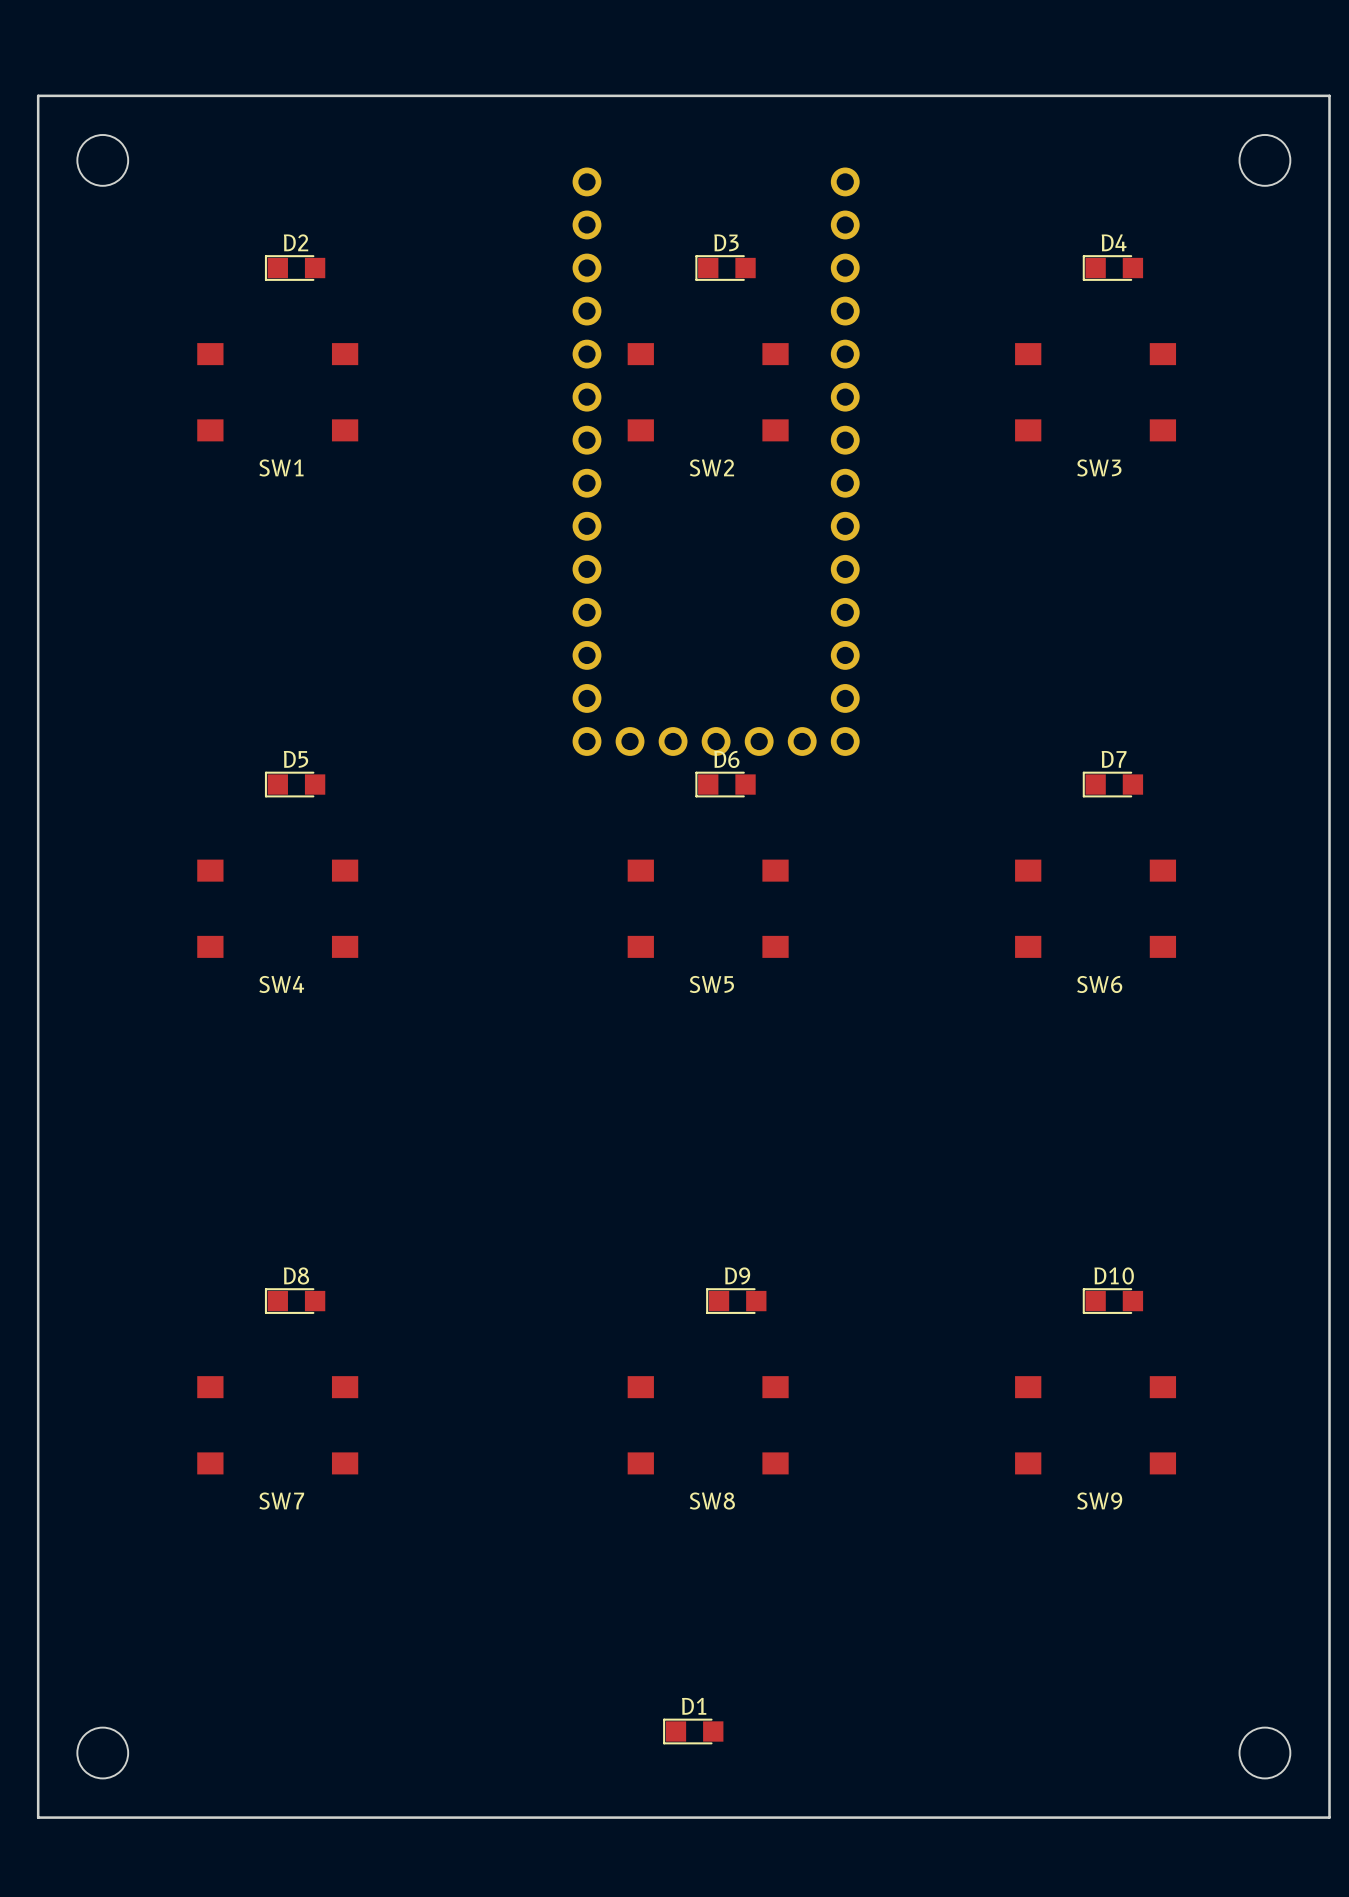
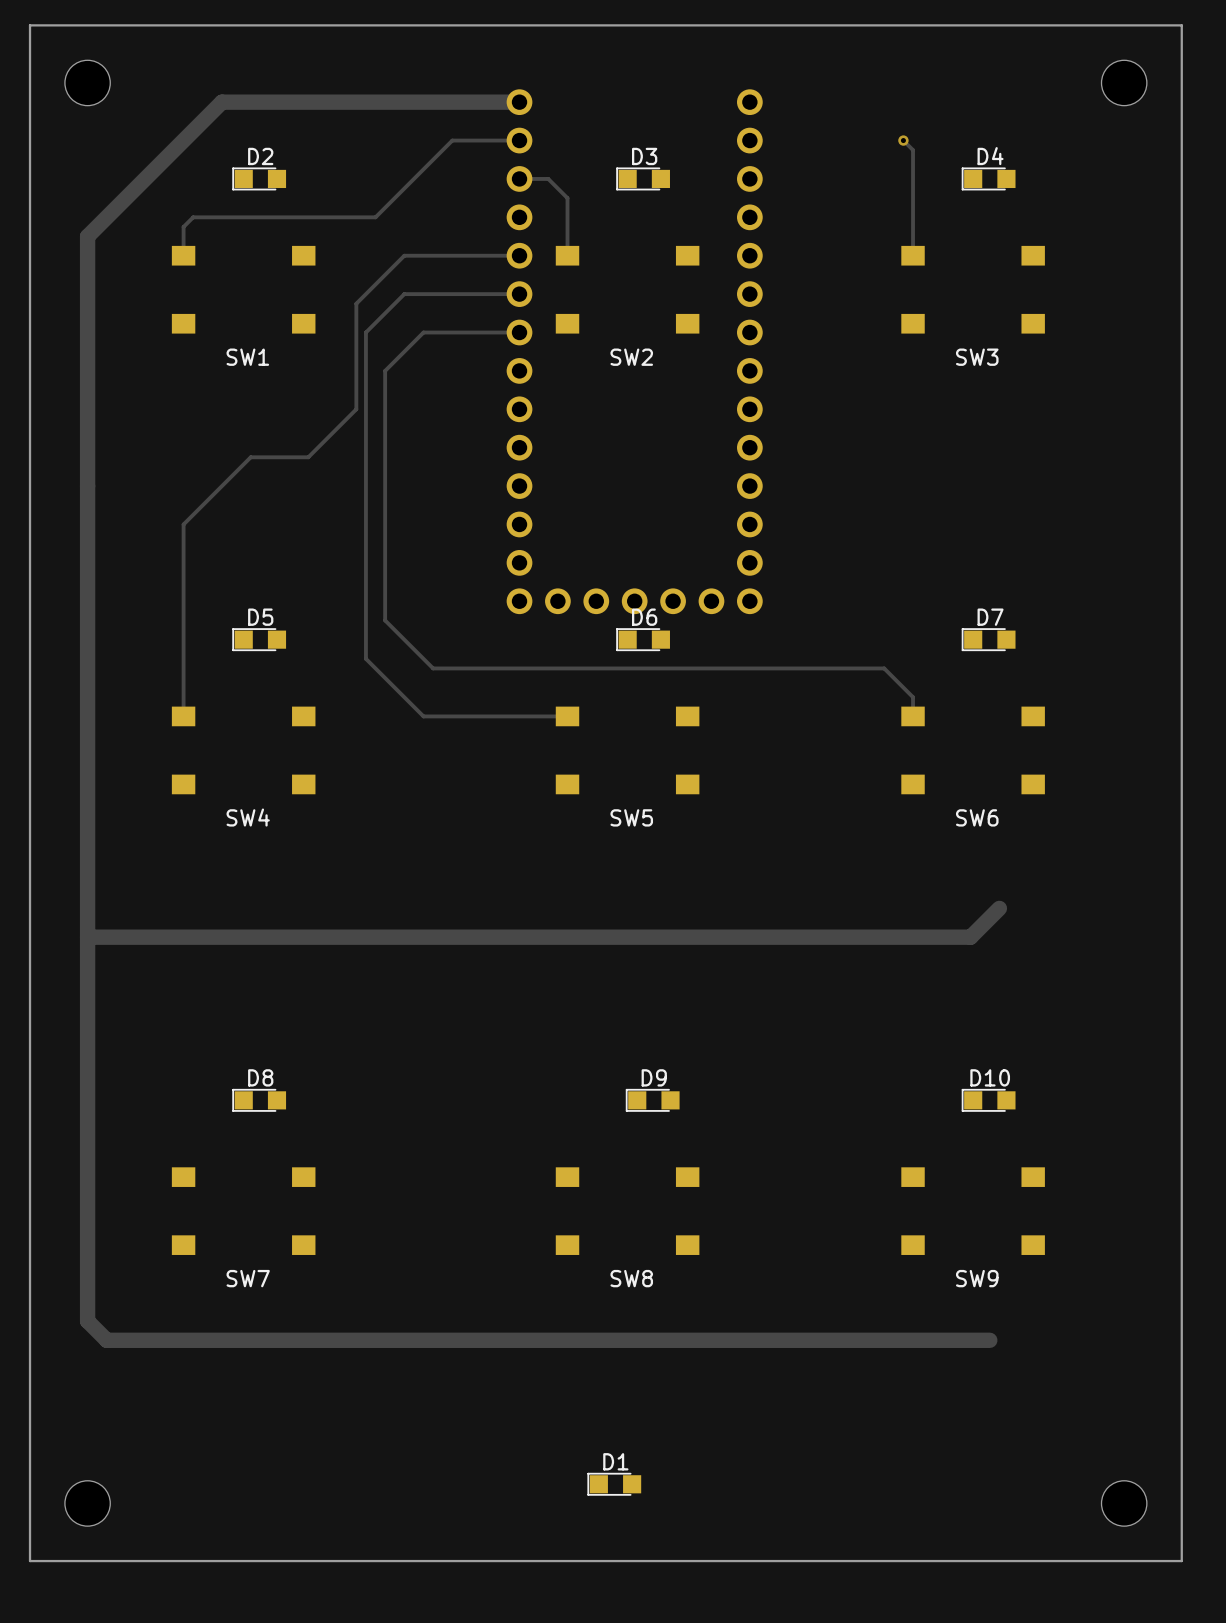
track: none -> (519, 102) (221, 102) (87, 236) (87, 1321) (106, 1340) (989, 1340)
track: none -> (519, 140) (452, 140) (375, 217) (193, 217) (183, 226) (183, 255)
track: none -> (903, 140) (913, 150) (913, 255)
via: none -> (903, 140)
track: none -> (519, 178) (548, 178) (567, 198) (567, 255)
track: none -> (519, 255) (404, 255) (356, 303) (356, 409) (308, 457) (250, 457) (183, 524) (183, 716)
track: none -> (519, 294) (404, 294) (365, 332) (365, 658) (423, 716) (567, 716)
track: none -> (519, 332) (423, 332) (385, 370) (385, 620) (433, 668) (884, 668) (913, 697) (913, 716)
track: none -> (999, 908) (970, 937) (87, 937)

